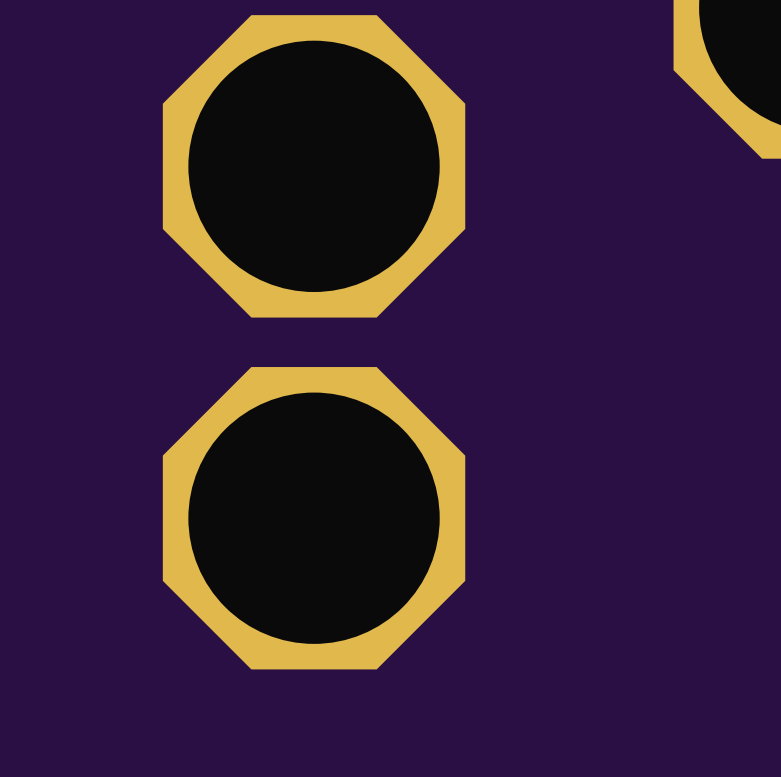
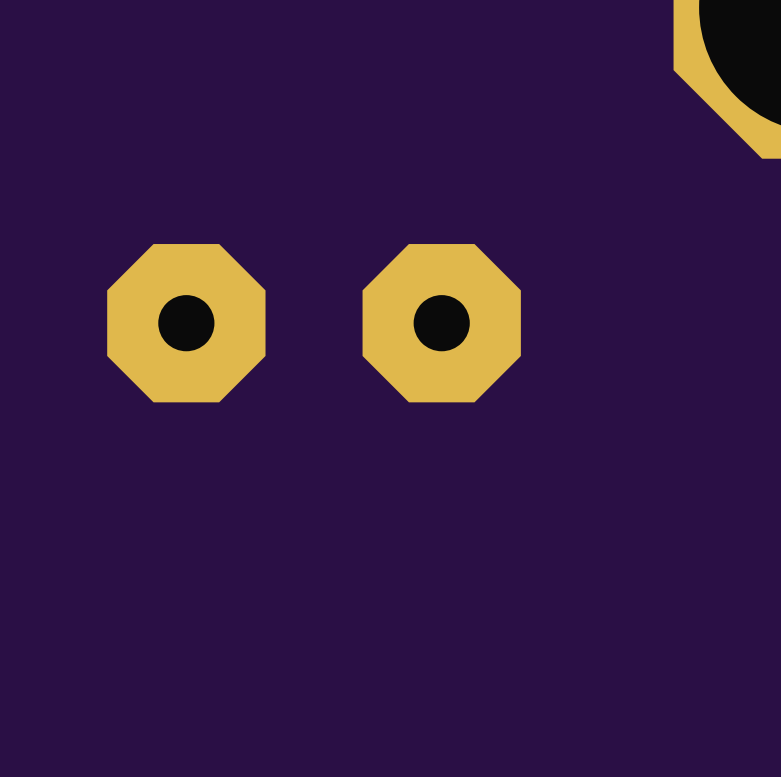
part footprint: [162, 15, 466, 670] -> [107, 244, 521, 403]

